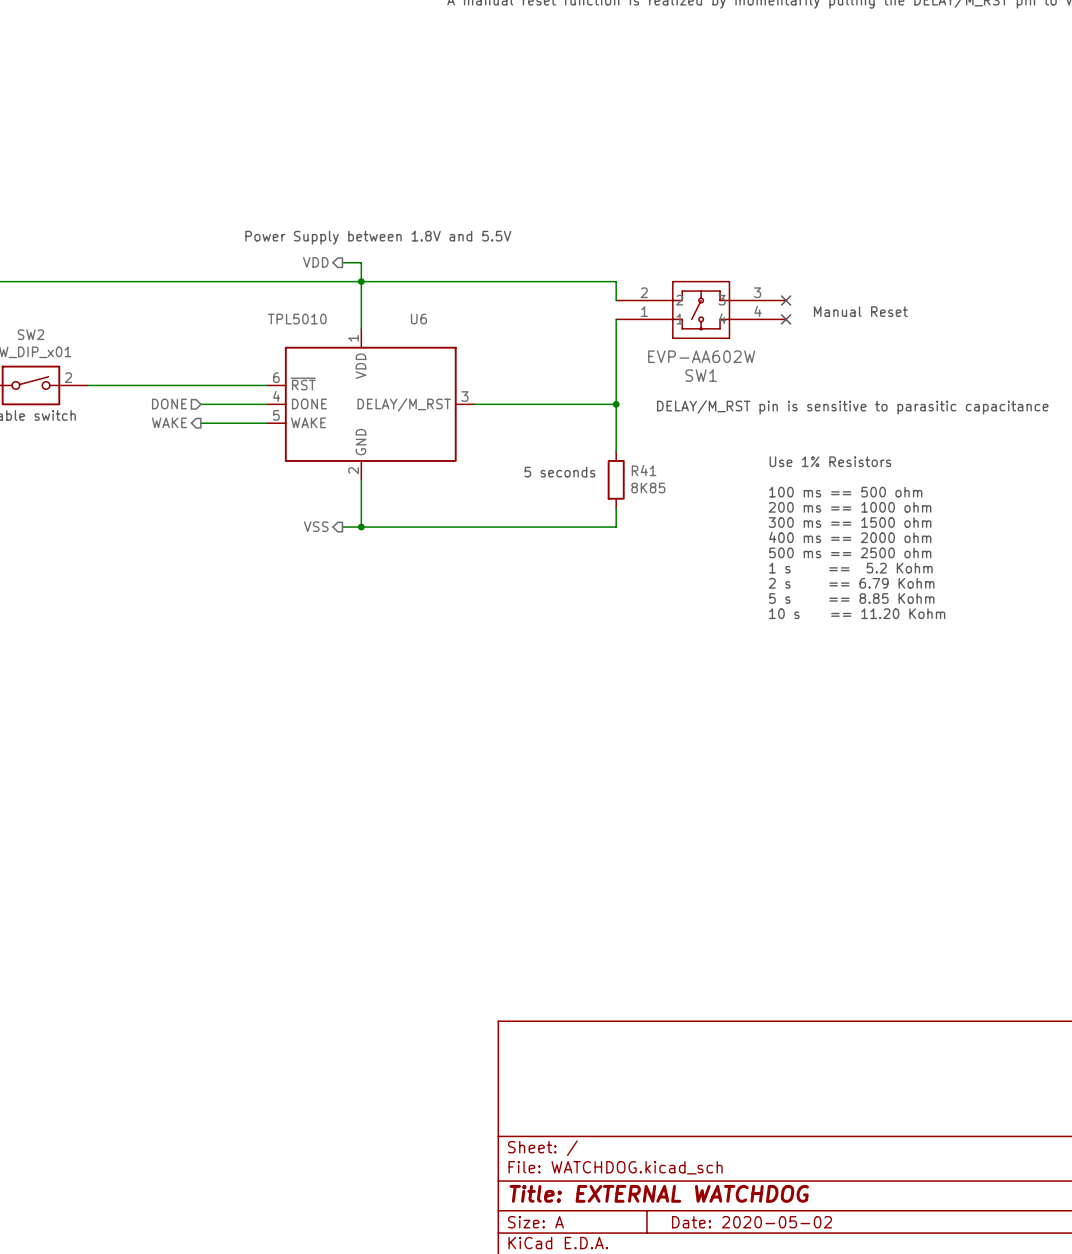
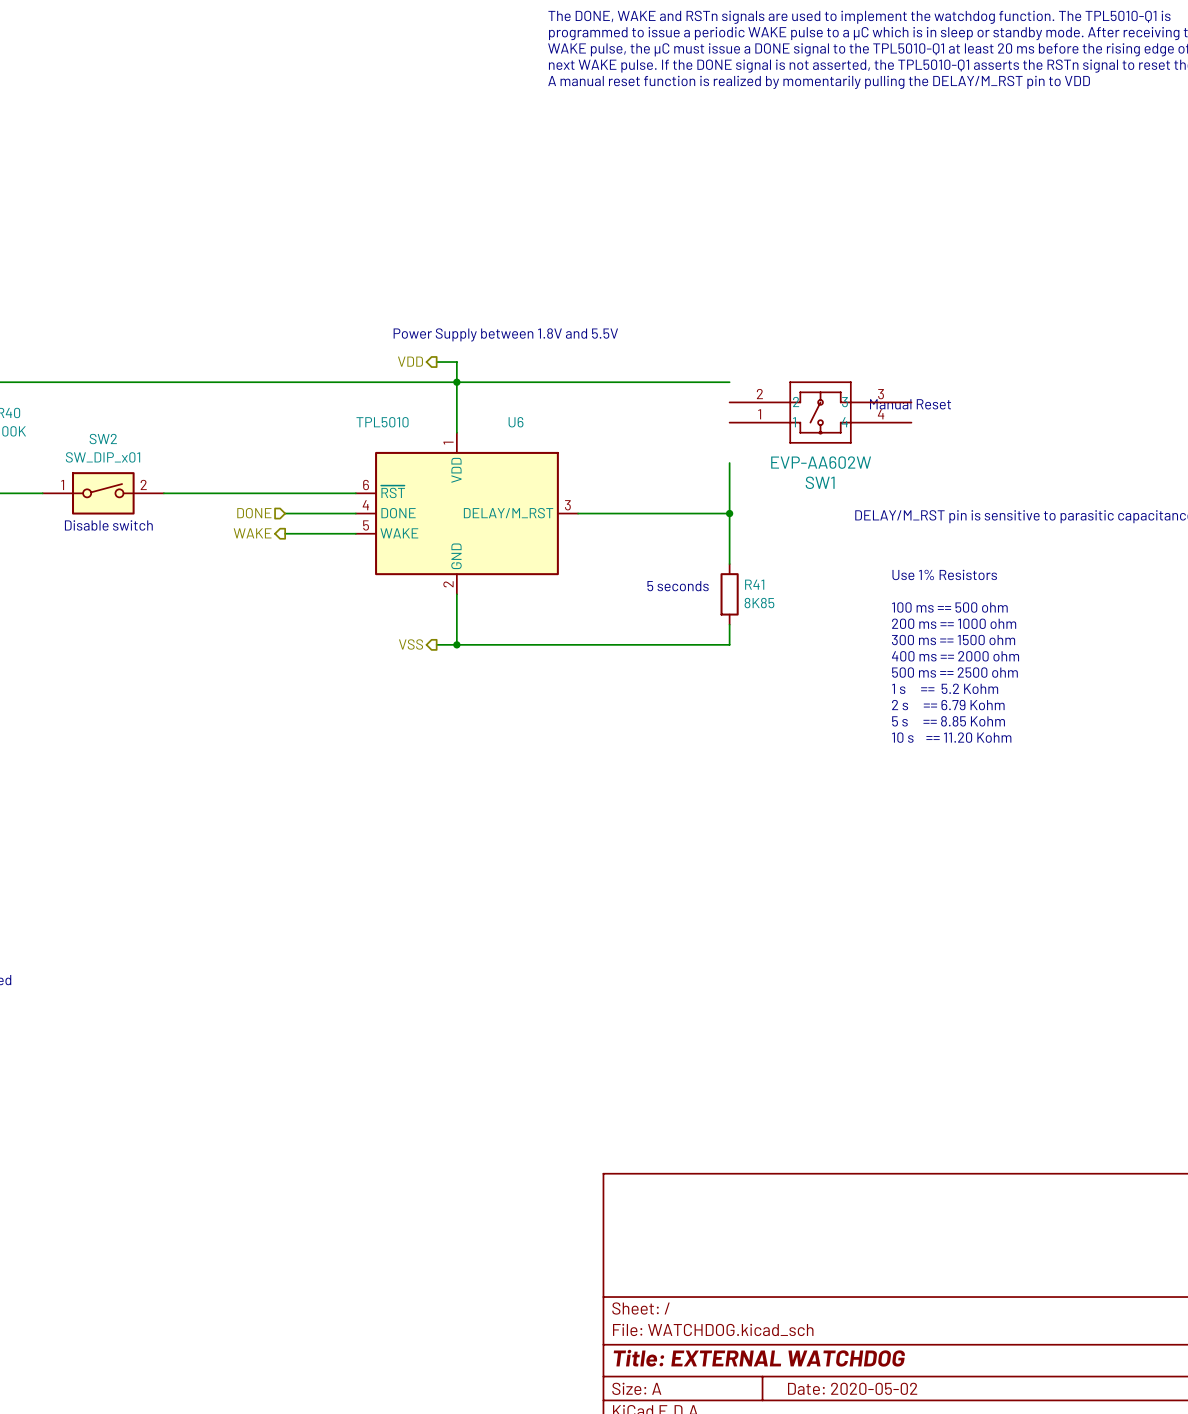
wire: (616, 281) (616, 300) -> none
no-connect mark: (786, 300) -> none
text position: Manual Reset (860, 311) -> Manual Reset (910, 404)
wire: (616, 319) (616, 357) -> none
no-connect mark: (786, 319) -> none

